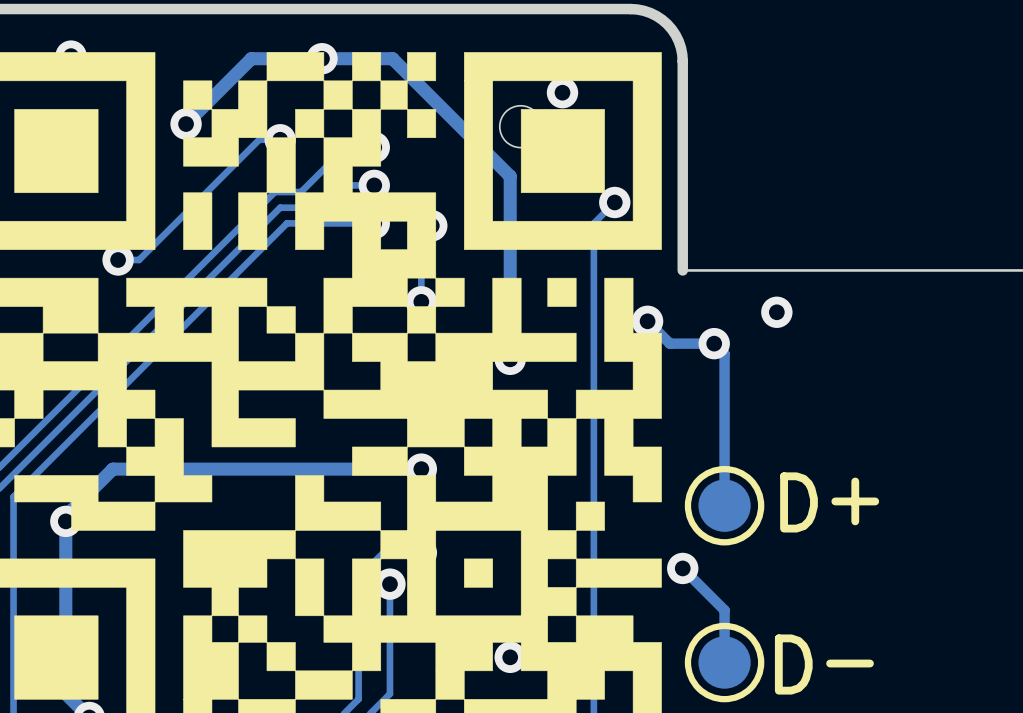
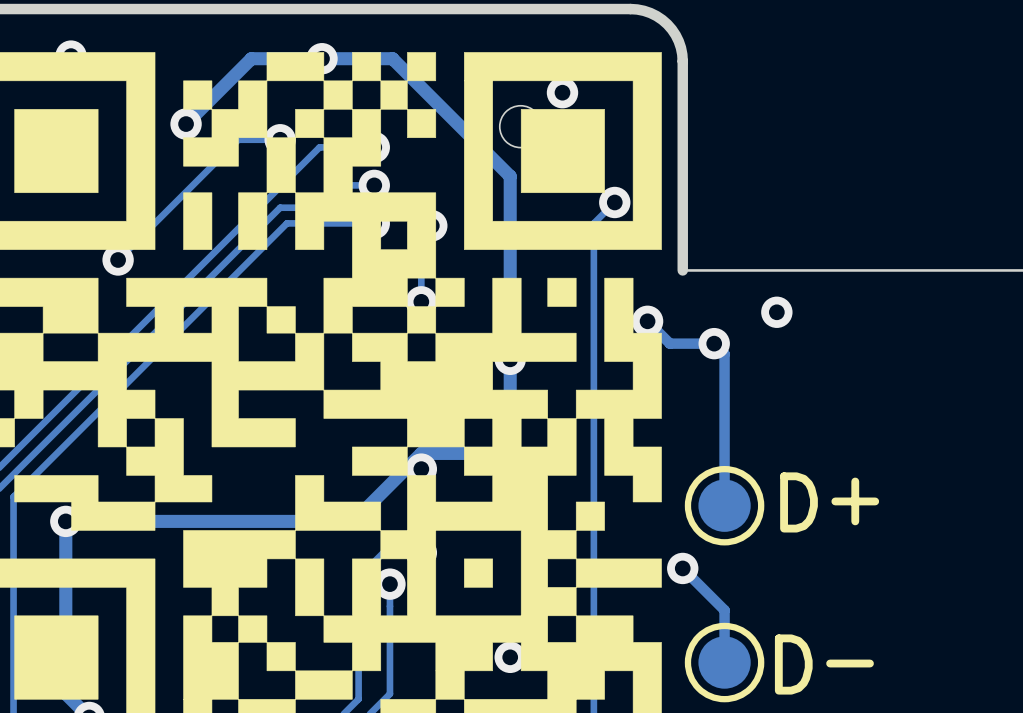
track: (259, 139) (139, 259) (118, 259) -> (259, 139) (238, 139) (118, 259)
track: (345, 147) (301, 192) (274, 192) -> (345, 147) (319, 147) (274, 192)
track: (421, 469) (112, 469) (65, 516) (65, 521) -> (510, 359) (510, 453) (421, 453) (353, 521) (65, 521)

